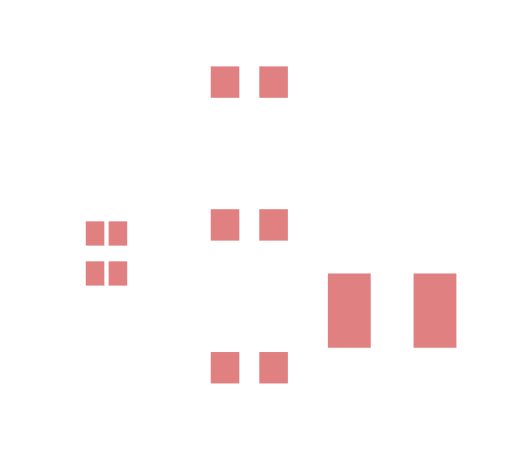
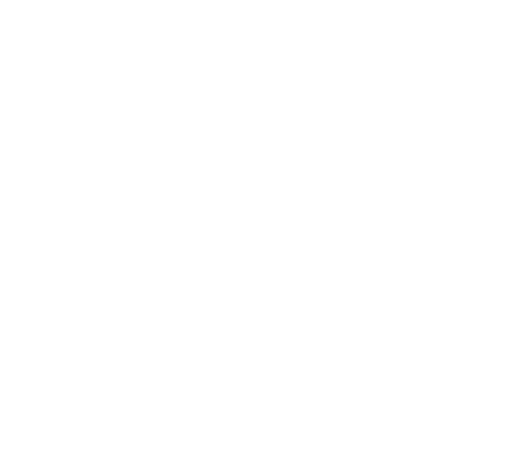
part: (249, 82) -> none
part: (249, 224) -> none
part: (106, 253) -> none
part: (392, 310) -> none
part: (249, 367) -> none

